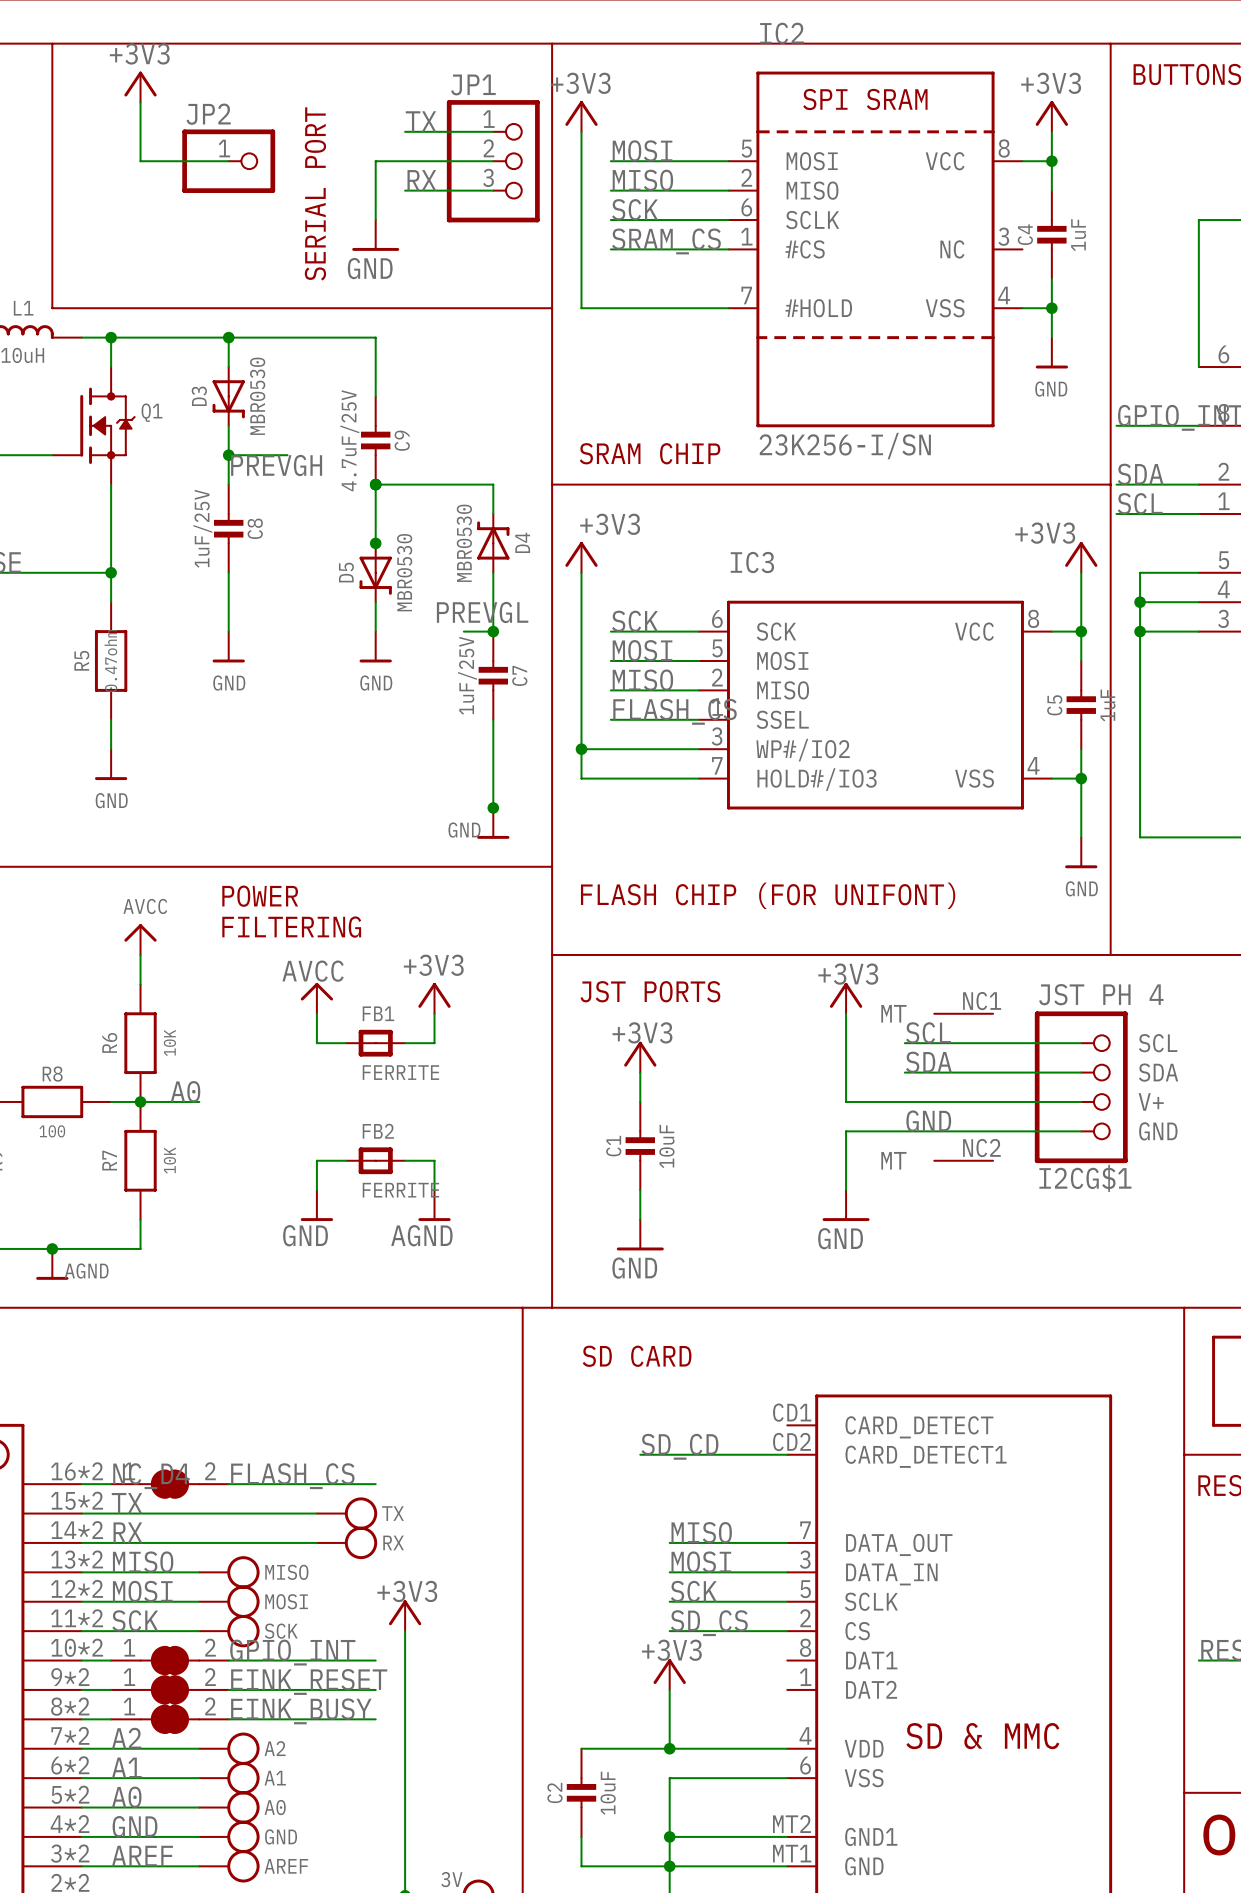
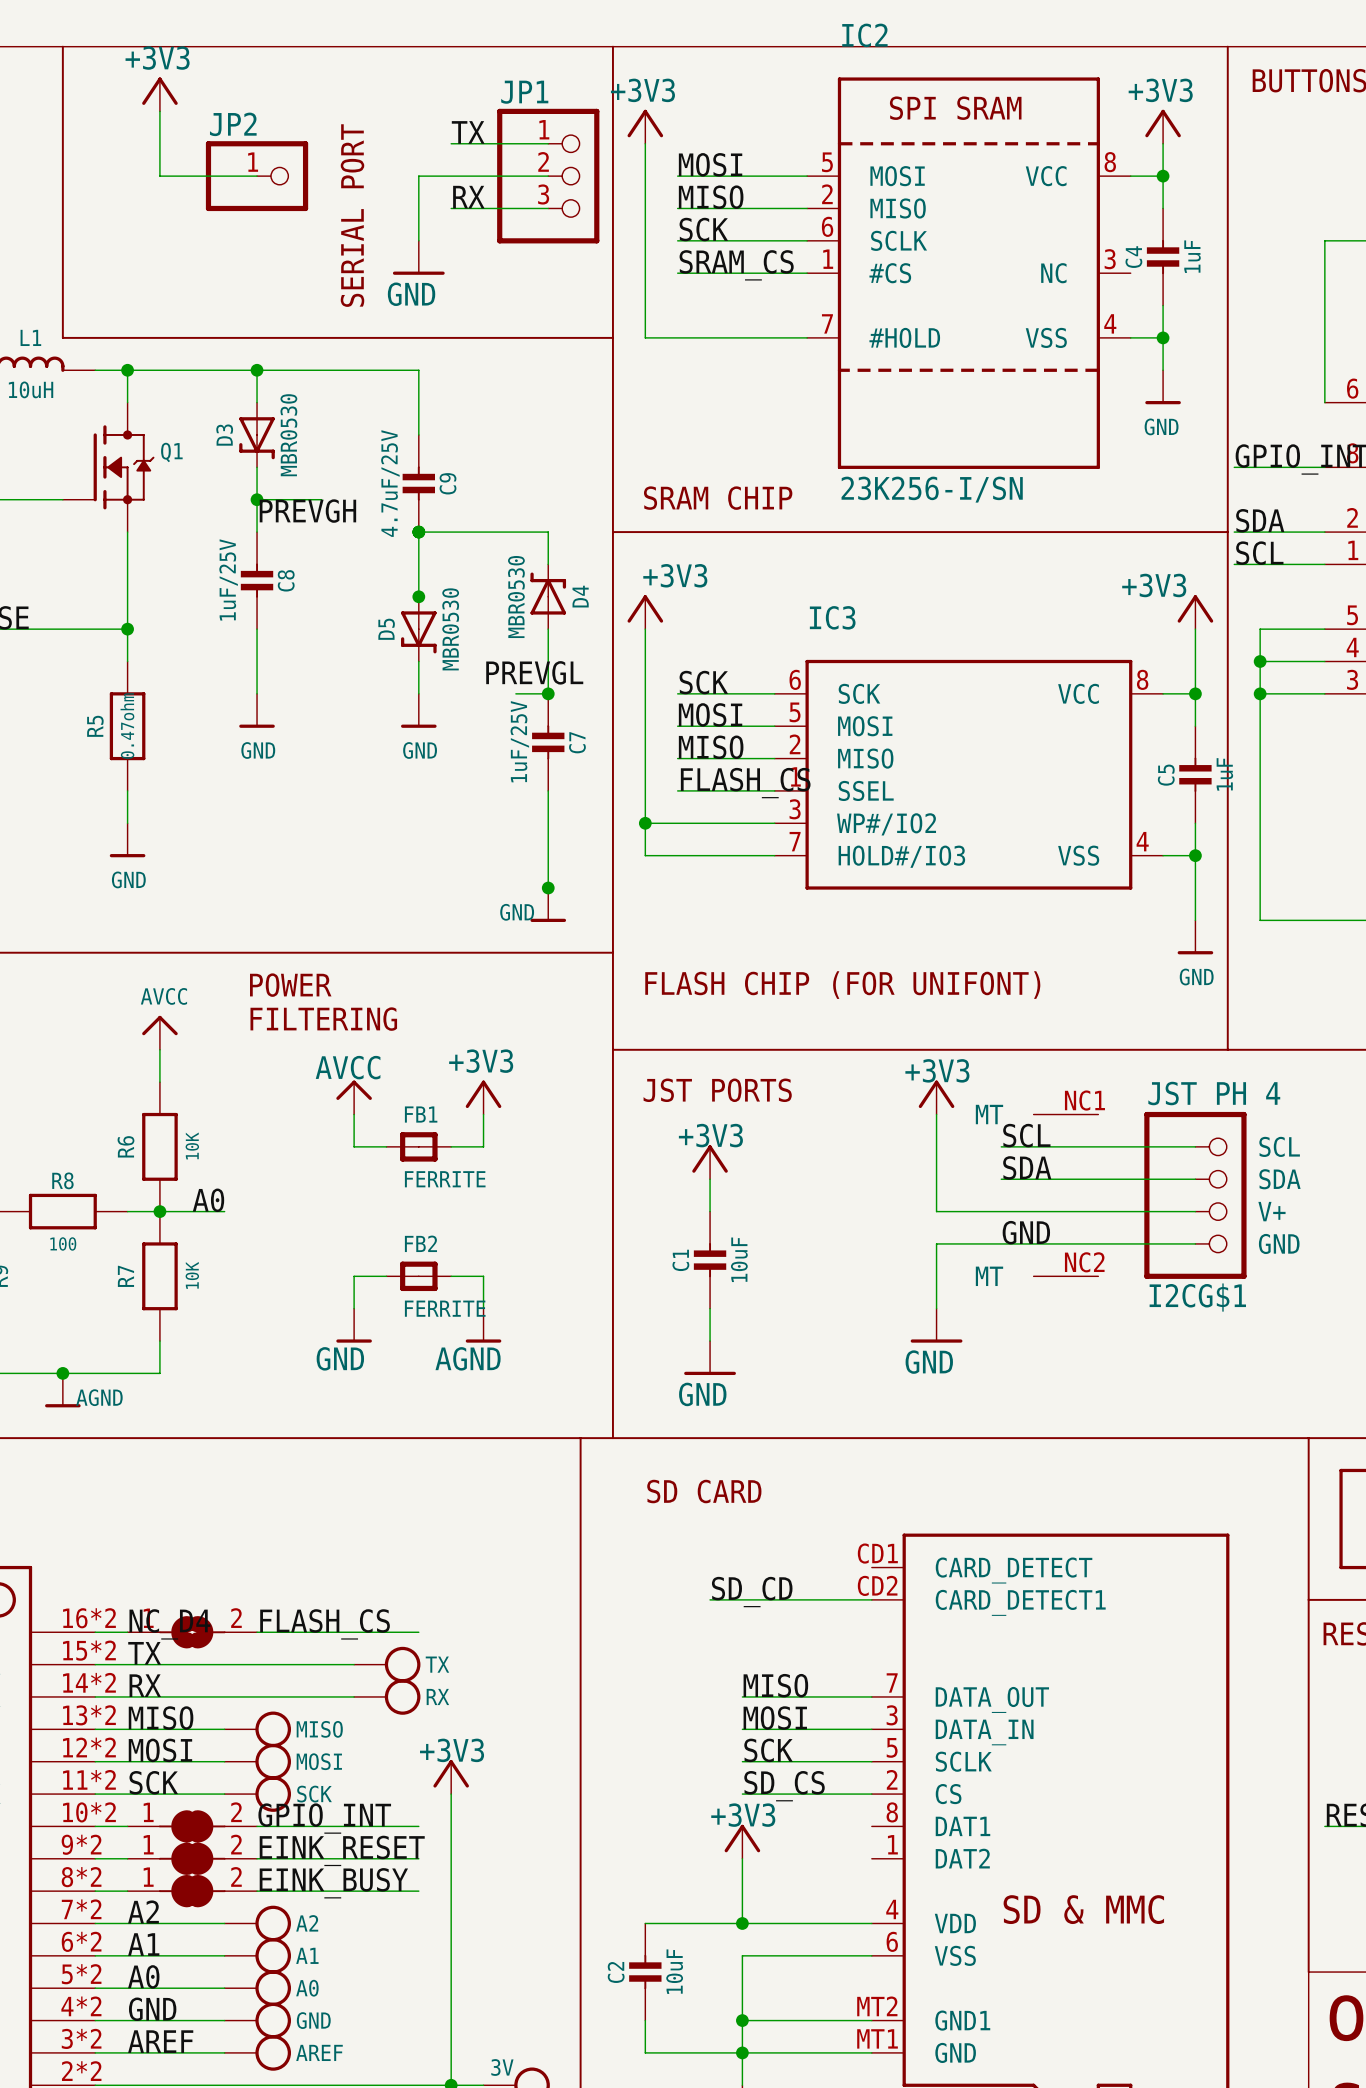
part symbol: [111, 1469, 229, 1499] -> [127, 1616, 258, 1649]

